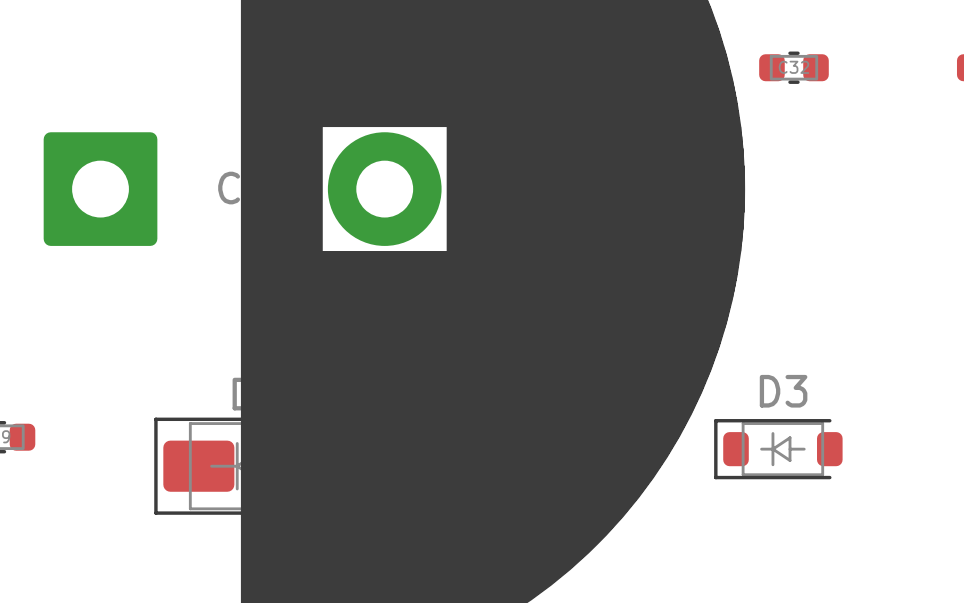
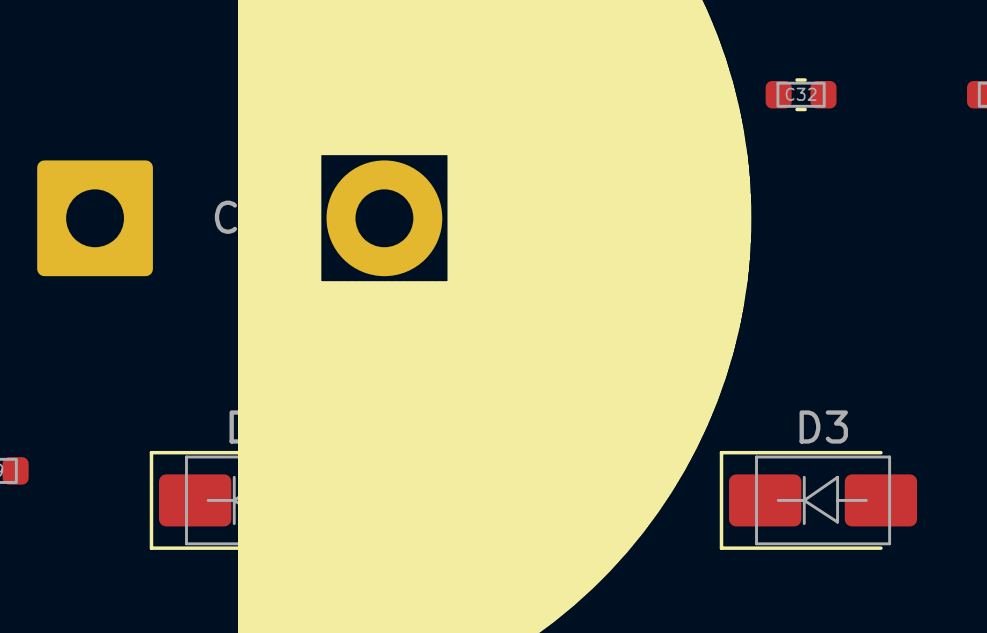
D3 footprint: [714, 419, 843, 480] -> [719, 450, 918, 550]

